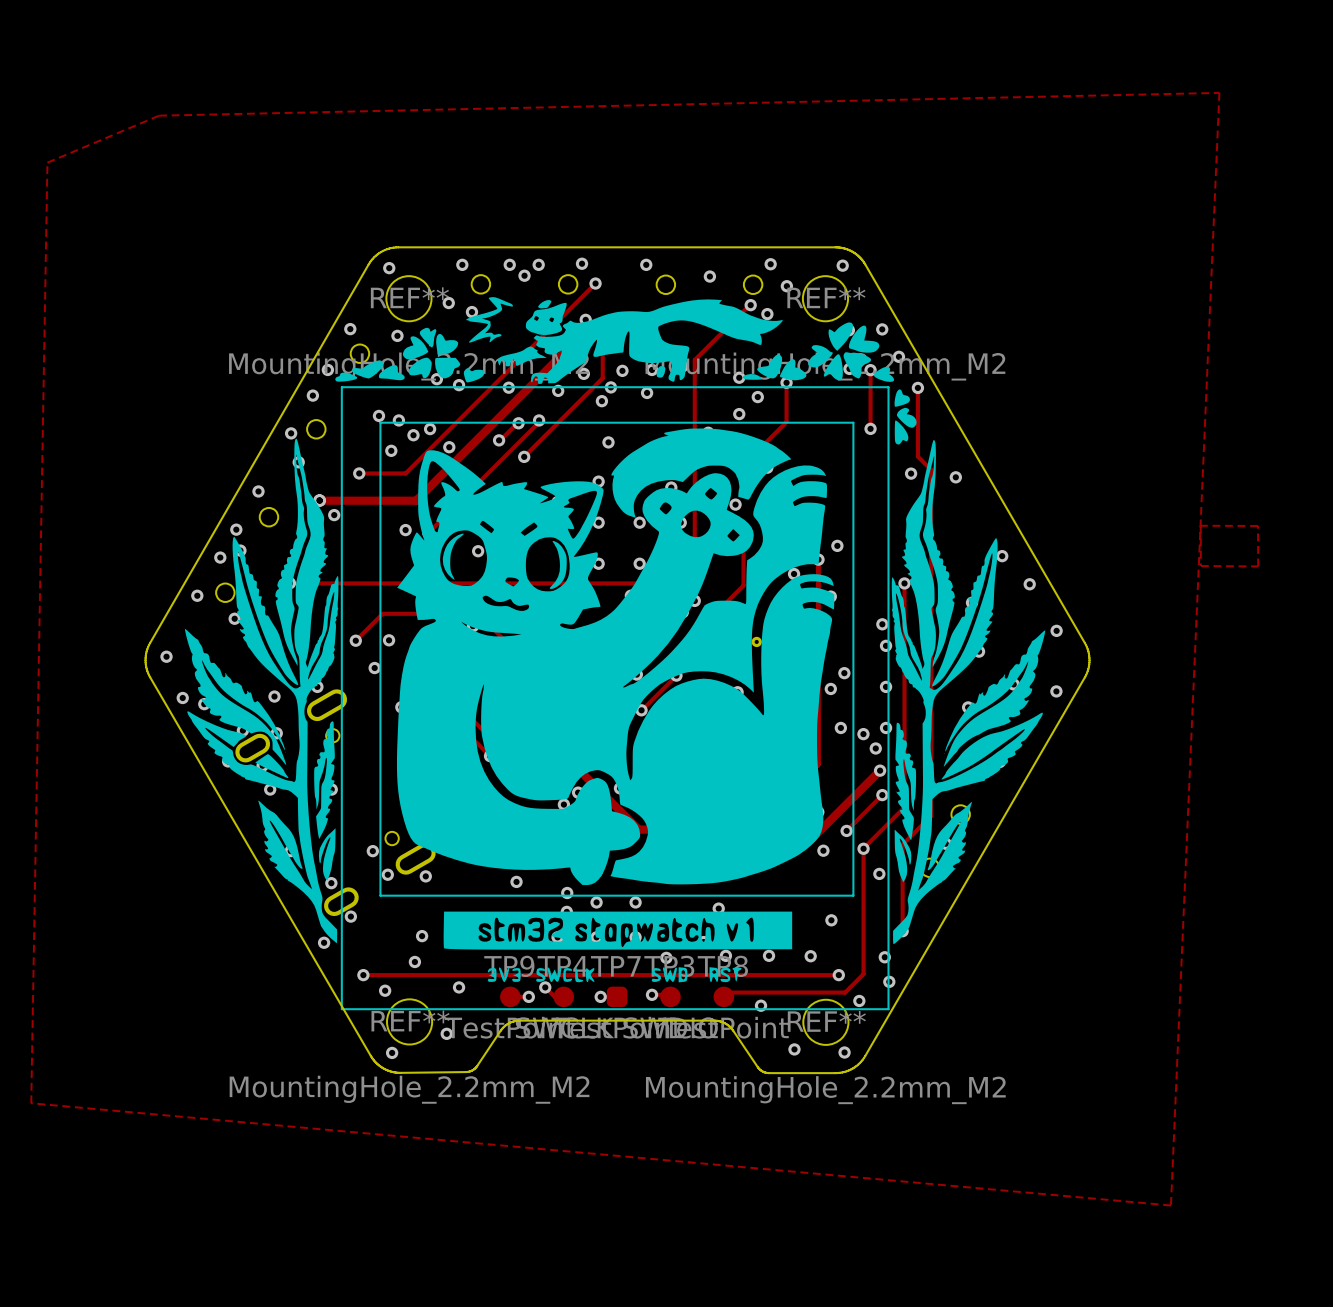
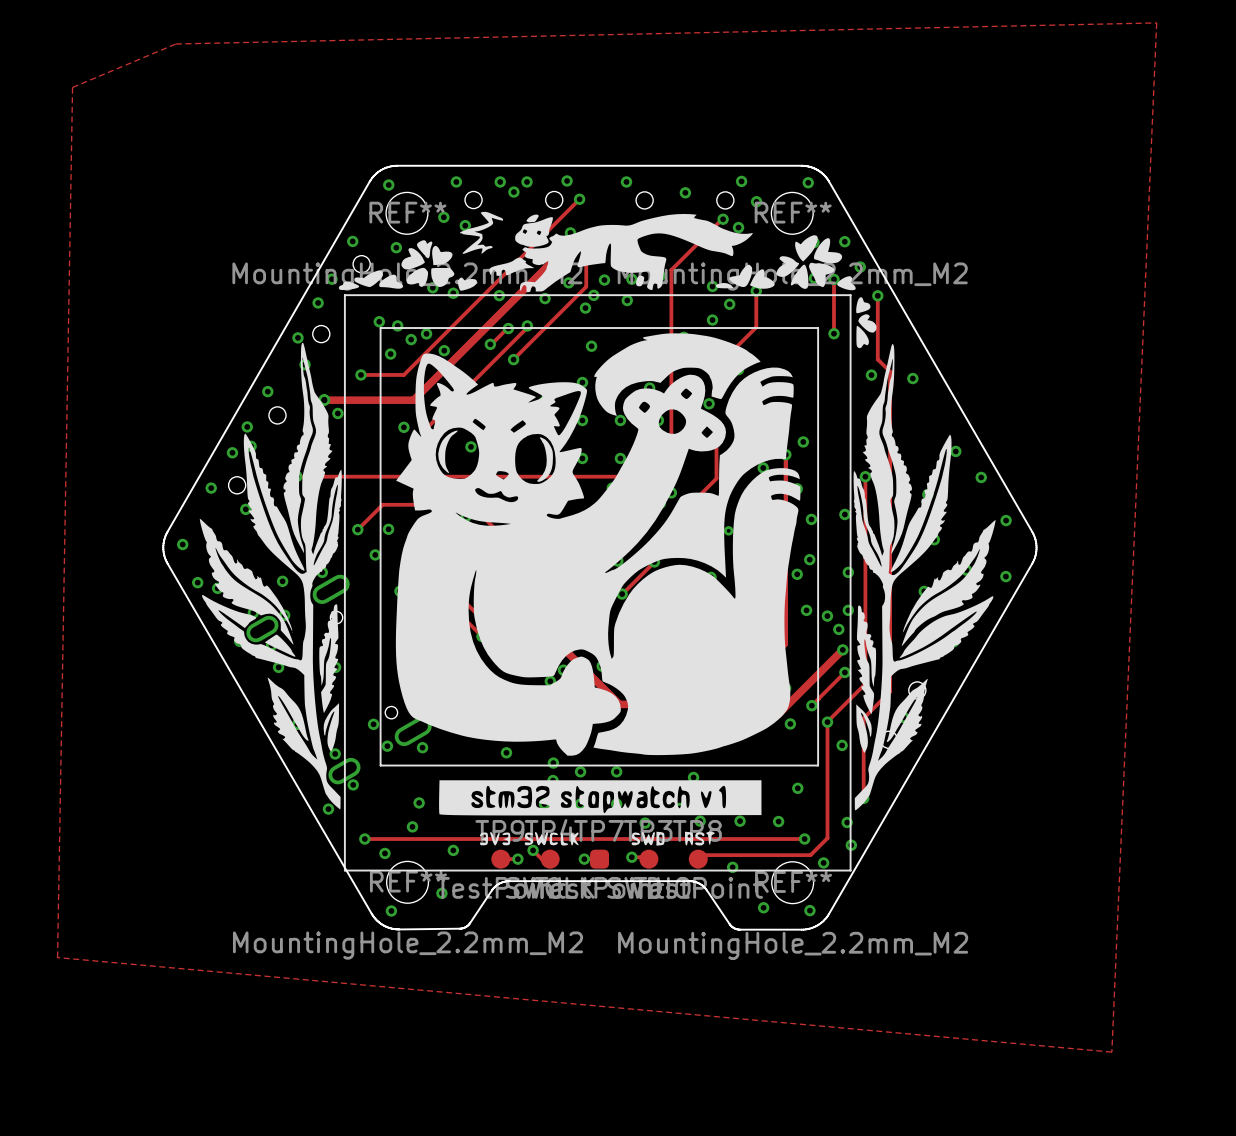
zone outline: (1200, 525) (1200, 565) (1258, 566) (1257, 525) (1200, 525) -> none
via position: (886, 645) -> (811, 519)

